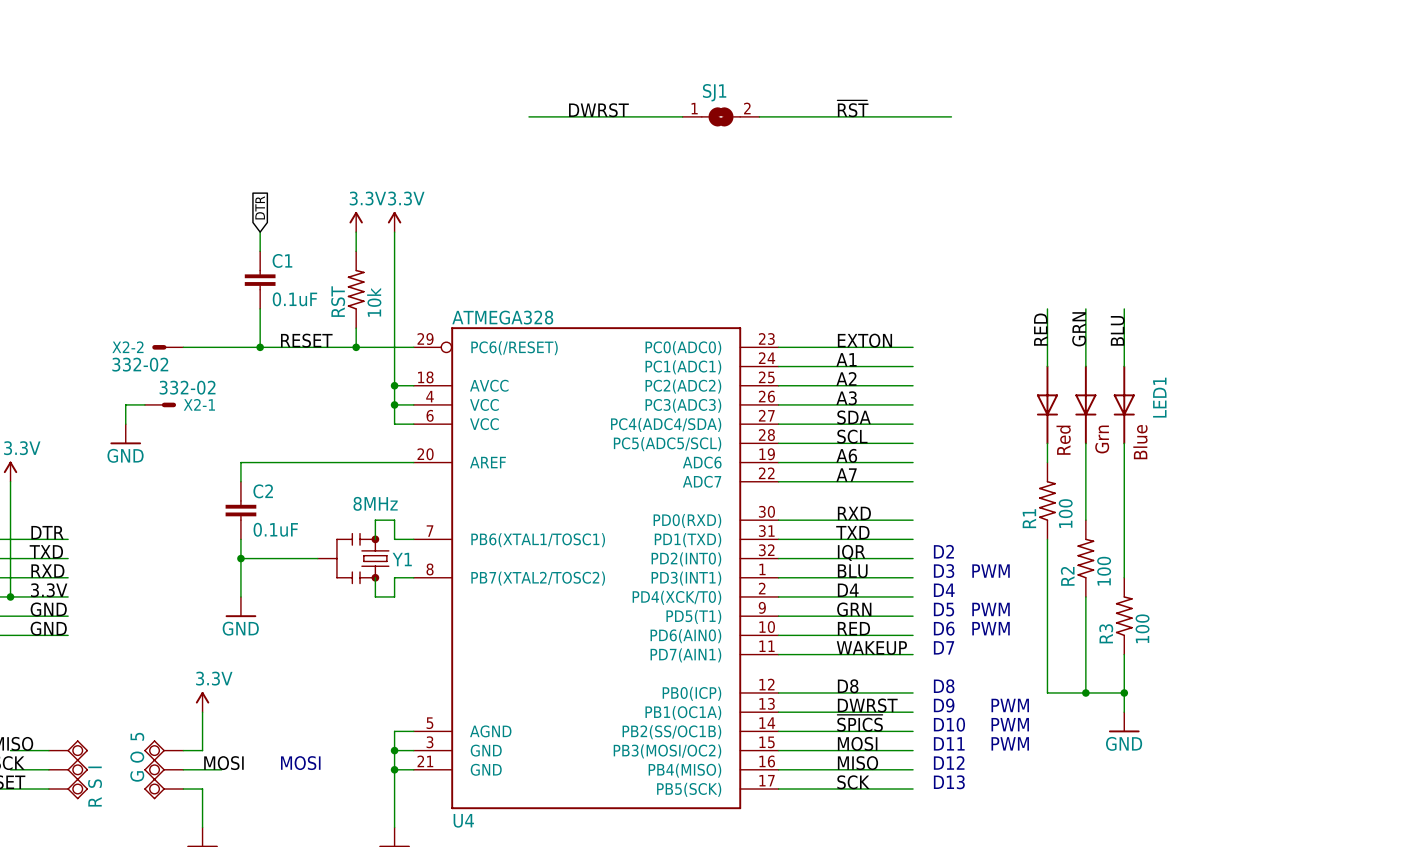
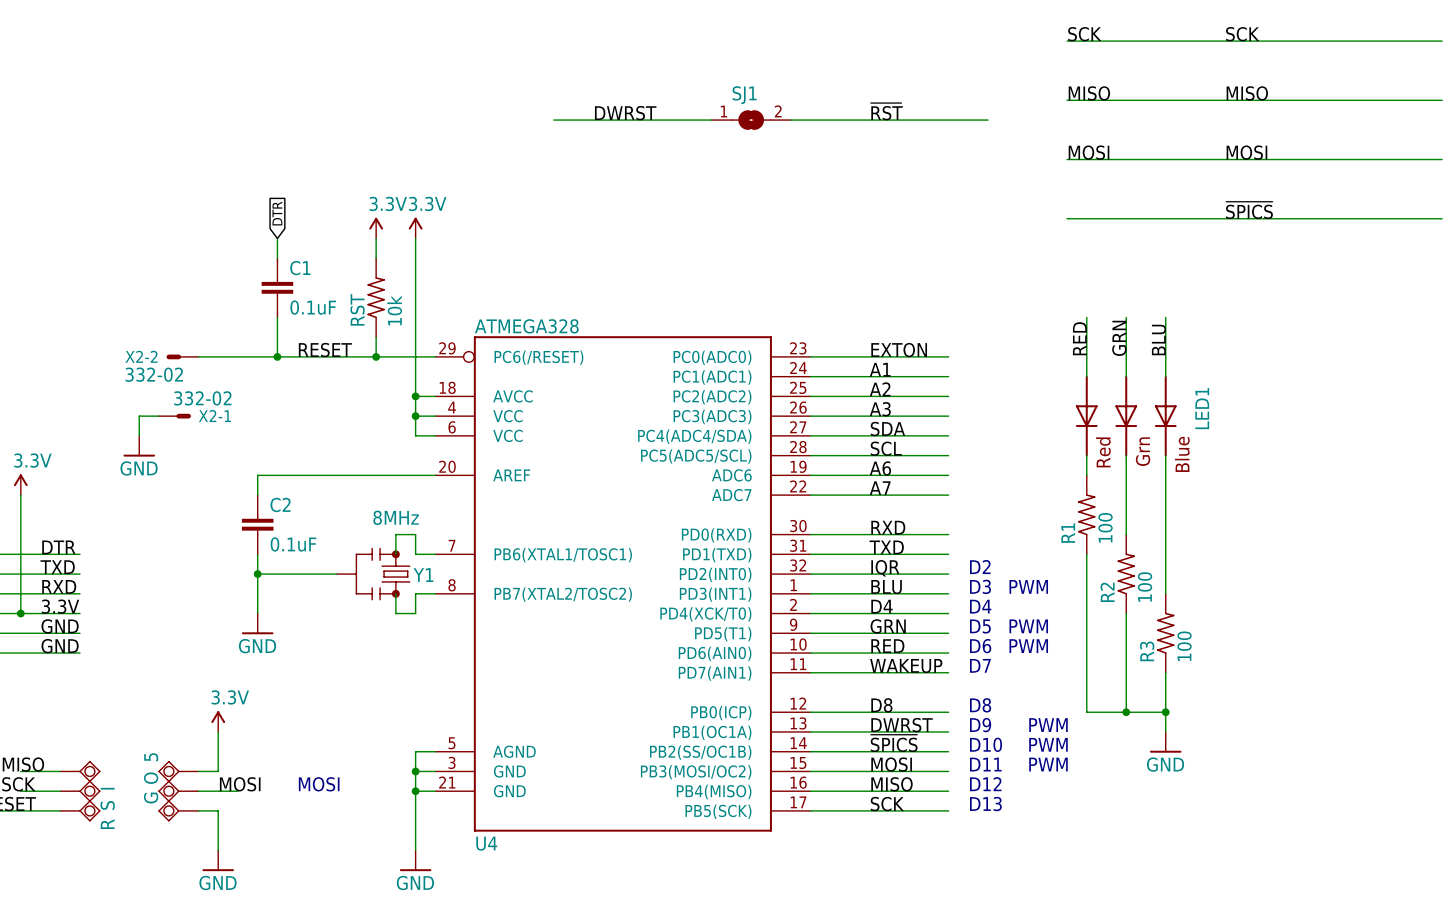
label: none -> SCK (1084, 34)
label: none -> SCK (1242, 34)
wire: none -> (1067, 41) (1442, 41)
label: none -> MISO (1089, 93)
label: none -> MISO (1247, 93)
wire: none -> (1067, 100) (1442, 100)
label: none -> MOSI (1089, 152)
label: none -> MOSI (1246, 152)
wire: none -> (1067, 159) (1442, 159)
label: none -> ~{SPICS} (1249, 210)
wire: none -> (1067, 218) (1442, 218)

